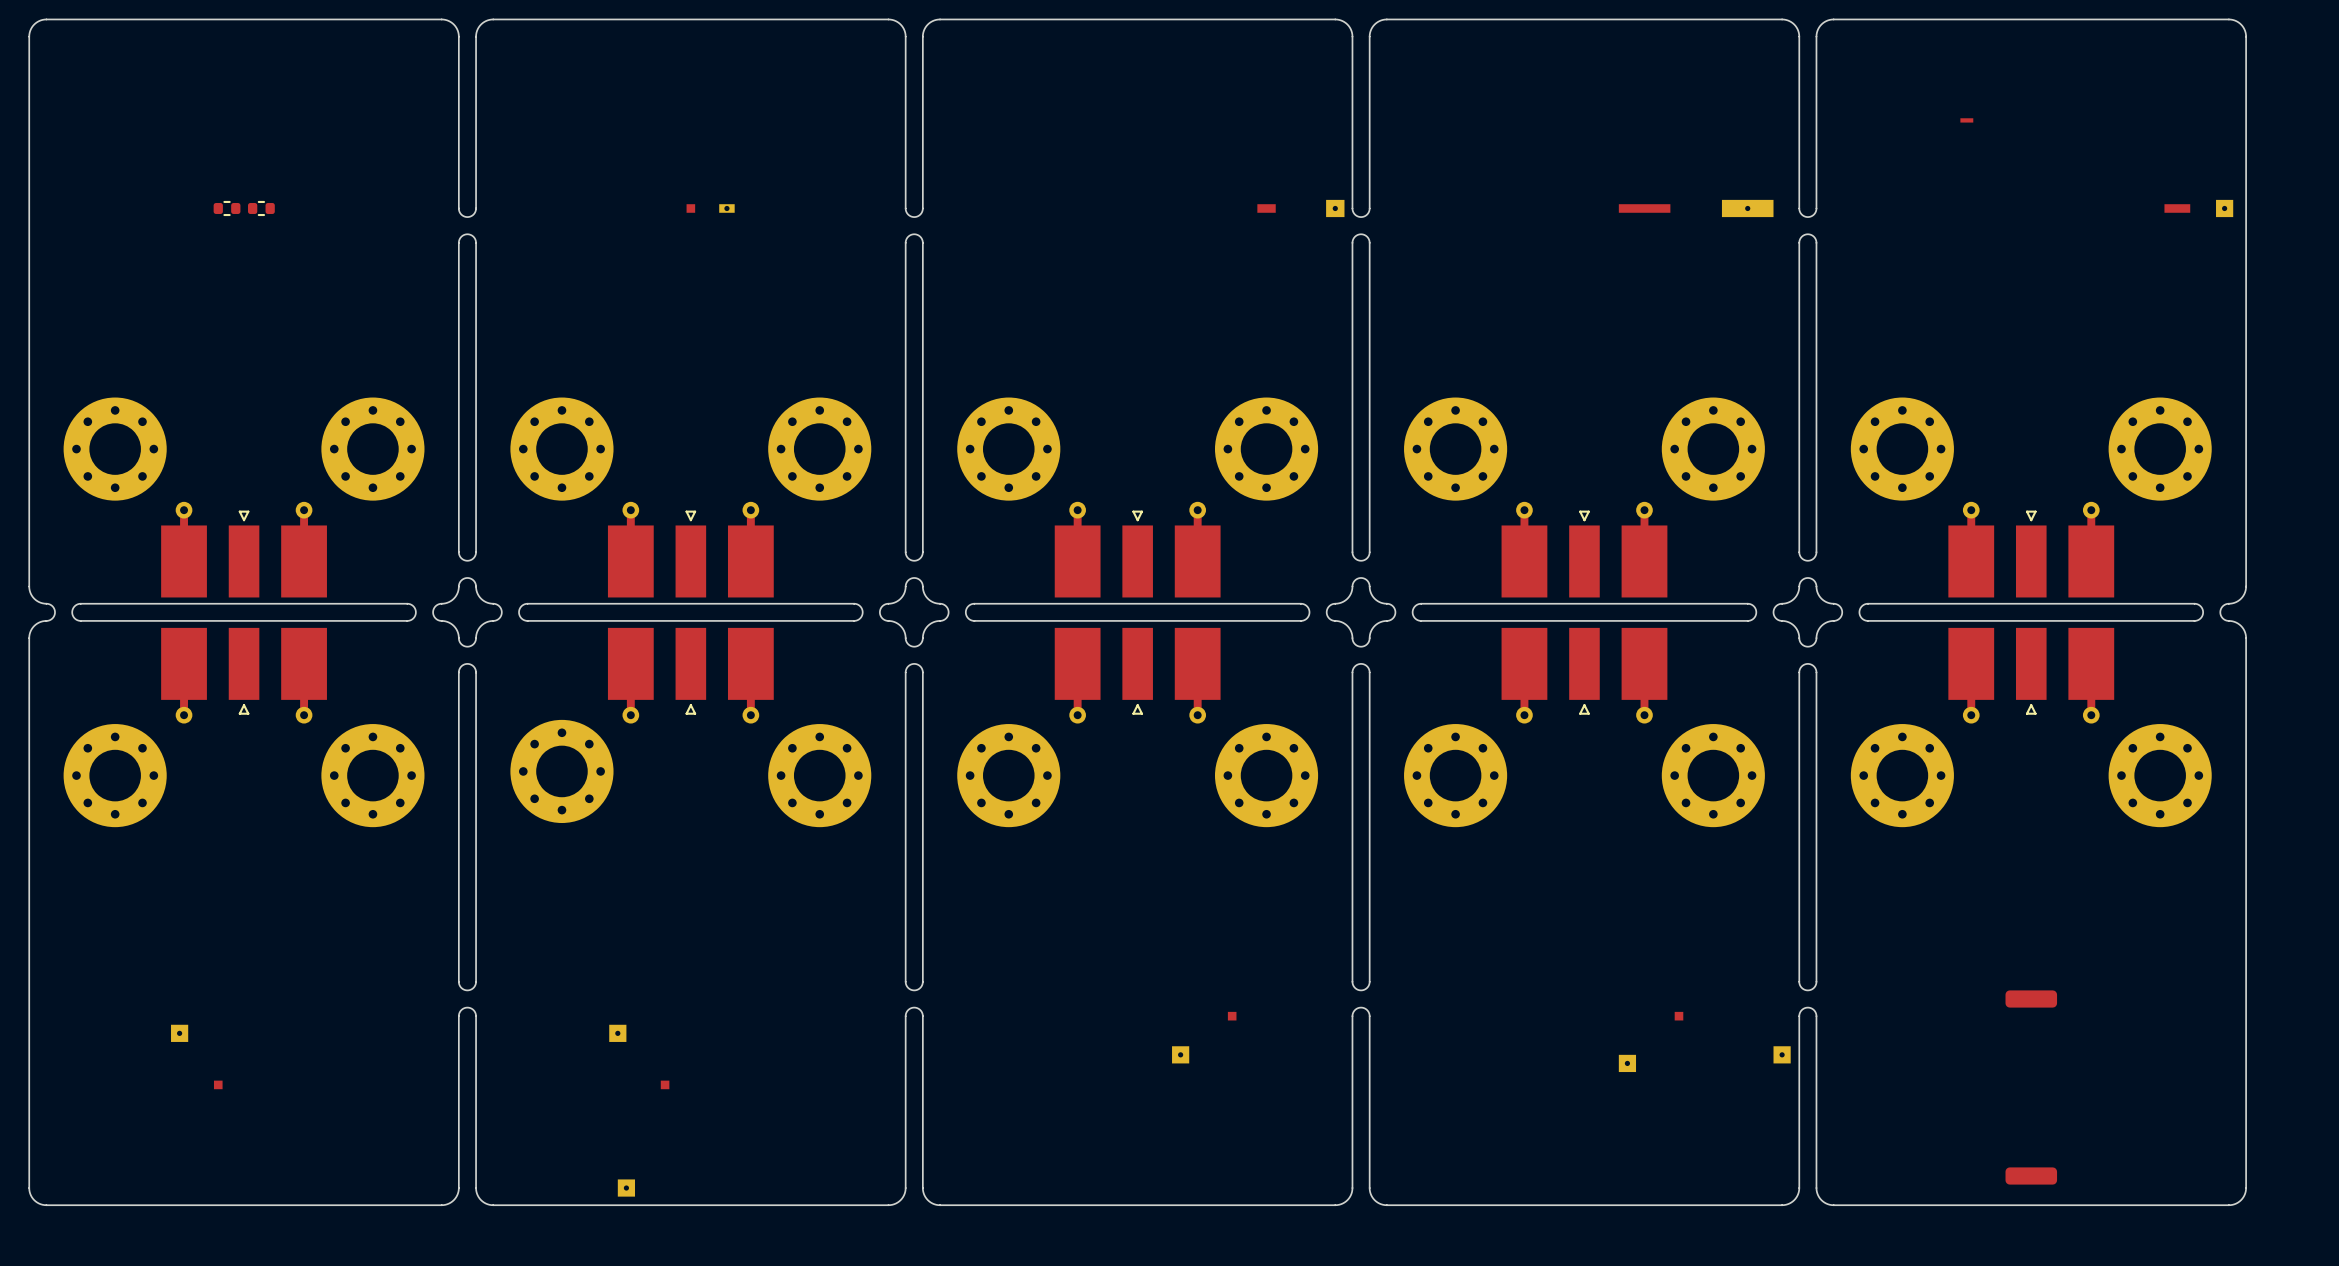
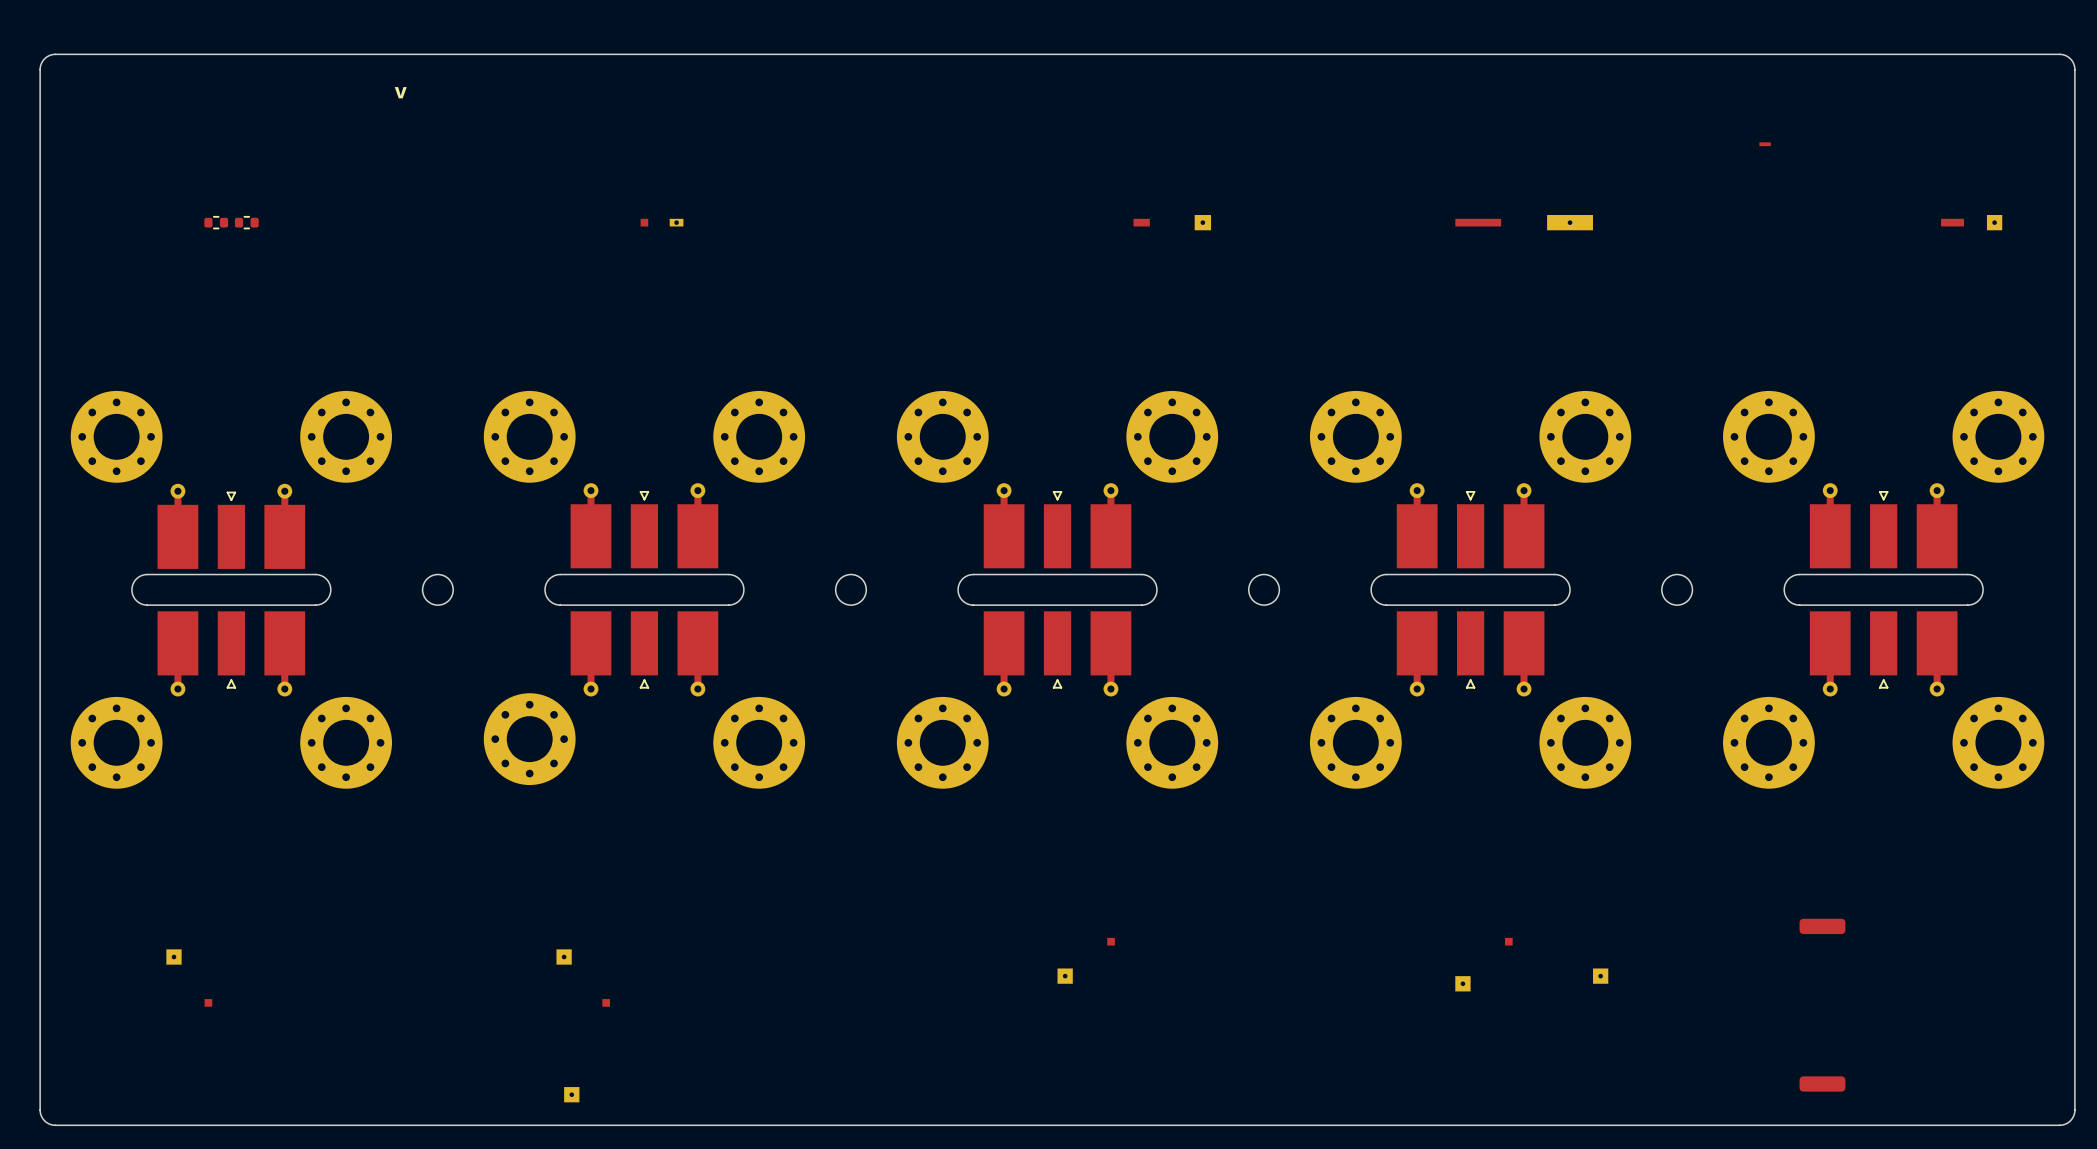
board edge: (441, 19) (452, 23) (458, 34) (458, 208) (461, 214) (467, 217) (473, 214) (476, 208) (476, 34) (482, 23) (493, 19) -> (407, 54) (453, 54)
board edge: (888, 19) (899, 23) (905, 34) (905, 208) (908, 214) (914, 217) (920, 214) (922, 208) (922, 34) (927, 24) (940, 19) -> (805, 54) (850, 54)
board edge: (1335, 19) (1346, 23) (1352, 34) (1352, 208) (1354, 214) (1361, 217) (1367, 214) (1369, 208) (1369, 34) (1374, 24) (1386, 19) -> (1202, 54) (1248, 54)
board edge: (1782, 19) (1794, 24) (1799, 34) (1799, 208) (1801, 214) (1807, 217) (1813, 214) (1816, 208) (1816, 34) (1822, 23) (1833, 19) -> (1600, 54) (1646, 54)
board edge: (2228, 19) (2241, 24) (2246, 36) (2246, 586) (2241, 598) (2234, 602) (2224, 604) (2220, 612) (2224, 619) (2234, 621) (2241, 625) (2246, 638) (2246, 1188) (2243, 1197) (2236, 1203) (2228, 1205) (1833, 1205) (1826, 1203) (1819, 1197) (1816, 1189) (1816, 1016) (1813, 1010) (1807, 1007) (1801, 1010) (1799, 1016) (1799, 1189) (1794, 1200) (1784, 1205) (1386, 1205) (1379, 1203) (1373, 1198) (1369, 1189) (1369, 1016) (1367, 1010) (1361, 1007) (1354, 1010) (1352, 1016) (1352, 1189) (1347, 1200) (1337, 1205) (940, 1205) (932, 1203) (925, 1197) (922, 1189) (922, 1016) (920, 1010) (914, 1007) (908, 1010) (905, 1016) (905, 1189) (900, 1200) (892, 1204) (493, 1205) (485, 1203) (479, 1198) (476, 1189) (476, 1016) (473, 1010) (467, 1007) (461, 1010) (458, 1016) (458, 1189) (455, 1198) (447, 1204) (46, 1205) (34, 1200) (29, 1188) -> (1998, 54) (2063, 54) (2071, 60) (2074, 67) (2074, 1110) (2072, 1118) (2066, 1123) (2059, 1125) (55, 1125) (47, 1122) (41, 1116) (40, 1094)
text: none -> v (400, 92)
part position: (710, 208) -> (662, 222)
board edge: (458, 242) (458, 552) (461, 558) (467, 560) (473, 558) (476, 552) (476, 242) (473, 236) (467, 234) (461, 236) (458, 242) -> none
board edge: (905, 242) (905, 552) (908, 558) (914, 560) (920, 558) (922, 552) (922, 242) (920, 236) (914, 234) (908, 236) (905, 242) -> none
board edge: (1352, 242) (1352, 552) (1354, 558) (1361, 560) (1367, 558) (1369, 552) (1369, 242) (1367, 236) (1361, 234) (1354, 236) (1352, 242) -> none
board edge: (1799, 242) (1799, 552) (1801, 558) (1807, 560) (1813, 558) (1816, 552) (1816, 242) (1813, 236) (1807, 234) (1801, 236) (1799, 242) -> none
part position: (561, 449) -> (529, 436)
part position: (819, 449) -> (759, 436)
part position: (1008, 449) -> (942, 436)
part position: (1266, 449) -> (1172, 436)
part position: (1455, 449) -> (1355, 436)
part position: (1713, 449) -> (1585, 436)
part: (1902, 449) -> none
part: none -> (1768, 436)
part position: (2160, 449) -> (1998, 436)
part position: (690, 549) -> (644, 525)
part position: (1137, 549) -> (1057, 525)
part position: (1584, 549) -> (1470, 525)
part position: (2031, 549) -> (1883, 525)
board edge: (29, 586) (34, 598) (40, 602) (50, 604) (55, 612) (50, 619) (40, 621) (34, 625) (29, 638) -> (40, 559) (40, 605)
board edge: (458, 586) (453, 598) (436, 605) (433, 613) (437, 619) (447, 621) (453, 625) (460, 643) (468, 646) (474, 642) (477, 632) (481, 625) (498, 619) (501, 611) (497, 604) (487, 602) (481, 598) (477, 592) (475, 583) (471, 579) (463, 579) (458, 586) -> none
board edge: (905, 586) (900, 598) (883, 605) (879, 613) (884, 619) (894, 621) (900, 625) (907, 643) (915, 646) (921, 642) (923, 632) (927, 625) (945, 619) (948, 611) (944, 604) (934, 602) (927, 598) (923, 592) (922, 583) (918, 579) (909, 579) (905, 586) -> none
board edge: (1352, 586) (1347, 598) (1330, 605) (1326, 613) (1330, 619) (1340, 621) (1347, 625) (1354, 643) (1362, 646) (1368, 642) (1370, 632) (1374, 625) (1392, 619) (1395, 611) (1391, 604) (1381, 602) (1374, 598) (1370, 592) (1369, 583) (1365, 579) (1356, 579) (1352, 586) -> none
board edge: (1799, 586) (1794, 598) (1776, 605) (1773, 613) (1777, 619) (1787, 621) (1794, 625) (1801, 643) (1808, 646) (1815, 642) (1817, 632) (1821, 625) (1838, 619) (1842, 611) (1837, 604) (1827, 602) (1821, 598) (1817, 592) (1815, 583) (1812, 579) (1803, 579) (1799, 586) -> none
round board edge: none -> [421, 573, 454, 606]
round board edge: none -> [834, 573, 868, 606]
round board edge: none -> [1247, 573, 1281, 606]
round board edge: none -> [1661, 573, 1694, 606]
board edge: (149, 603) (79, 603) (73, 607) (72, 613) (75, 619) (80, 620) (407, 620) (412, 619) (415, 613) (414, 607) (408, 603) (338, 603) -> (147, 574) (136, 579) (131, 589) (136, 600) (147, 605) (317, 604) (326, 600) (330, 589) (326, 579) (315, 574)
board edge: (613, 603) (526, 603) (520, 607) (519, 613) (522, 619) (527, 620) (854, 620) (859, 619) (862, 613) (860, 607) (855, 603) (802, 603) -> (560, 574) (549, 579) (545, 589) (549, 600) (560, 605) (730, 604) (739, 600) (743, 589) (739, 579) (728, 574)
board edge: (1077, 603) (973, 603) (967, 607) (965, 613) (969, 619) (974, 620) (1300, 620) (1306, 619) (1309, 614) (1308, 608) (1303, 604) (1266, 603) -> (973, 574) (962, 579) (958, 589) (962, 600) (973, 605) (1143, 604) (1152, 600) (1156, 589) (1152, 579) (1141, 574)
board edge: (1541, 603) (1420, 603) (1414, 607) (1412, 613) (1415, 619) (1421, 620) (1747, 620) (1755, 616) (1756, 610) (1752, 604) (1730, 603) -> (1386, 574) (1375, 579) (1371, 589) (1375, 600) (1386, 605) (1556, 604) (1566, 599) (1569, 587) (1565, 579) (1554, 574)
board edge: (2005, 603) (1868, 603) (1861, 606) (1859, 612) (1861, 618) (1868, 620) (2194, 620) (2200, 618) (2203, 612) (2200, 606) (2194, 603) -> (1799, 574) (1788, 579) (1784, 589) (1788, 600) (1799, 605) (1969, 604) (1979, 599) (1982, 587) (1978, 579) (1967, 574)
board edge: (458, 672) (458, 981) (461, 987) (467, 990) (473, 987) (476, 981) (476, 672) (473, 666) (467, 663) (461, 666) (458, 672) -> none
board edge: (905, 672) (905, 981) (908, 987) (914, 990) (920, 987) (922, 981) (922, 672) (920, 666) (914, 663) (908, 666) (905, 672) -> none
board edge: (1352, 672) (1352, 981) (1354, 987) (1361, 990) (1367, 987) (1369, 981) (1369, 672) (1367, 666) (1361, 663) (1354, 666) (1352, 672) -> none
board edge: (1799, 672) (1799, 981) (1801, 987) (1807, 990) (1813, 987) (1816, 981) (1816, 672) (1813, 666) (1807, 663) (1801, 666) (1799, 672) -> none
part position: (244, 675) -> (231, 653)
part position: (690, 675) -> (644, 653)
part position: (1137, 675) -> (1057, 653)
part position: (1584, 675) -> (1470, 653)
part position: (2031, 675) -> (1883, 653)
part position: (561, 771) -> (529, 739)
part position: (115, 775) -> (116, 742)
part position: (372, 775) -> (346, 742)
part position: (819, 775) -> (759, 742)
part position: (1008, 775) -> (942, 742)
part position: (1266, 775) -> (1172, 742)
part position: (1455, 775) -> (1355, 742)
part position: (1713, 775) -> (1585, 742)
part: (1902, 775) -> none
part position: (2160, 775) -> (1998, 742)
part: none -> (1768, 742)

